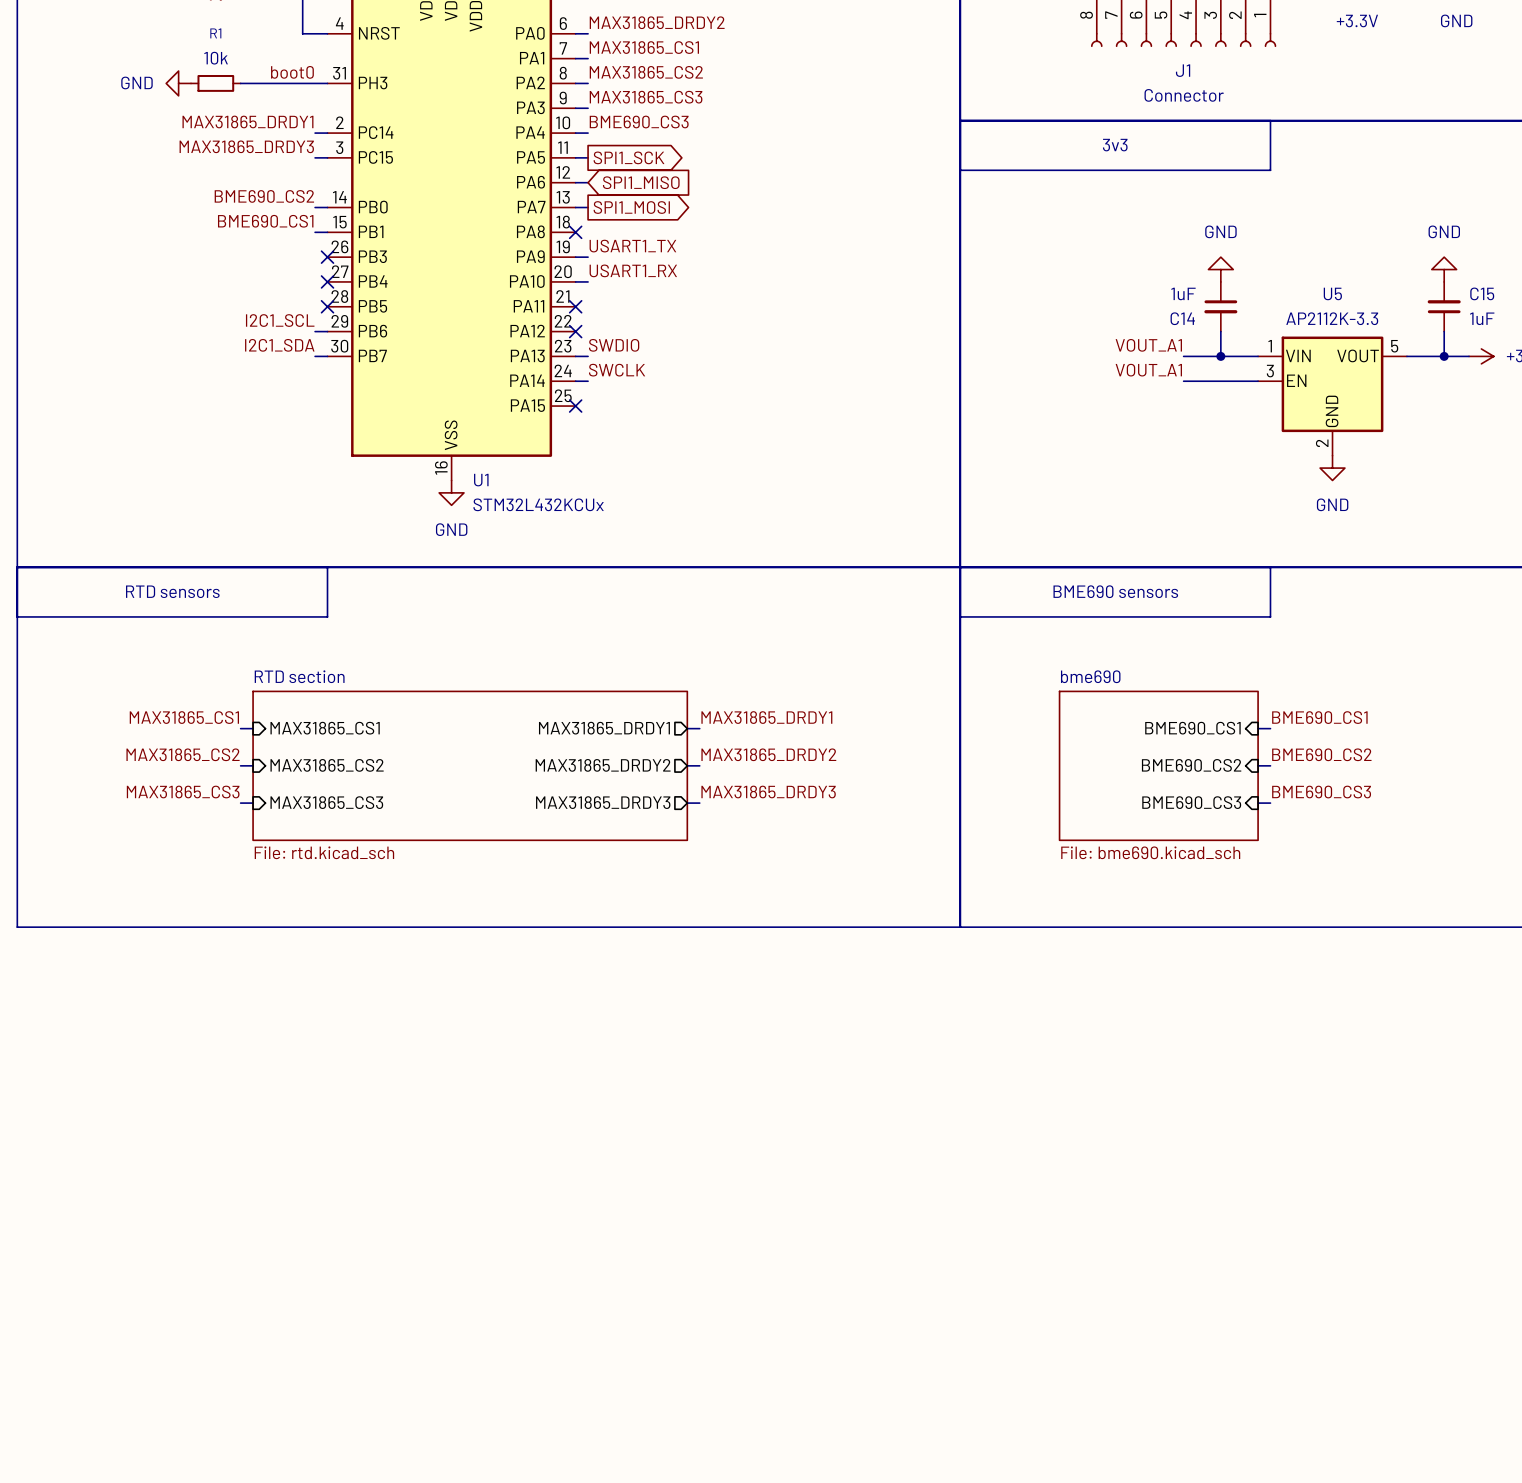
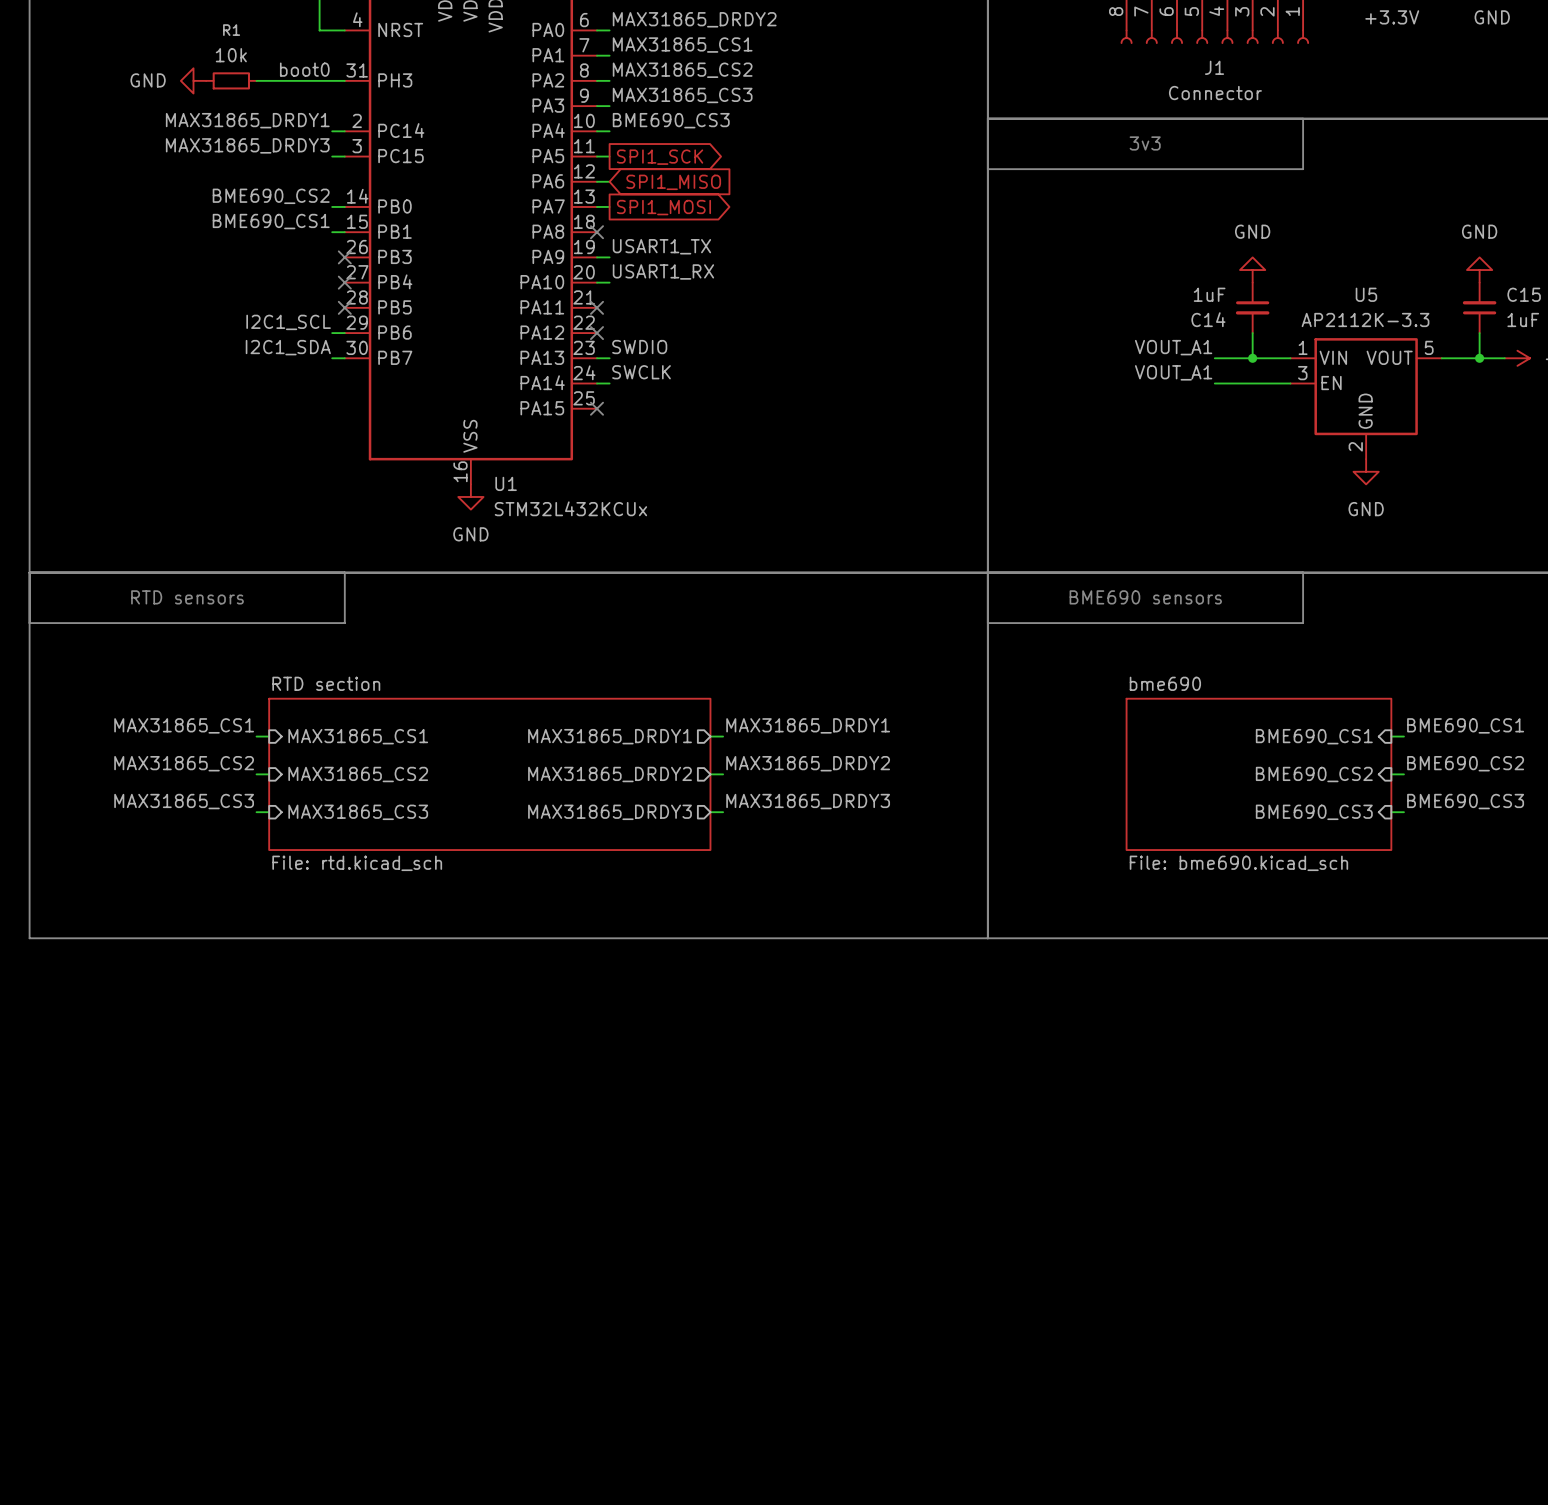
sheet bme690 name position: bme690 (1090, 676) -> bme690 (1165, 683)
sheet bme690 shape: [1058, 690, 1259, 842] -> [1125, 697, 1393, 851]
label position: BME690_CS1 (1319, 717) -> BME690_CS1 (1465, 725)
sheet pin position: BME690_CS1 (1192, 728) -> BME690_CS1 (1314, 736)
wire: (1258, 728) (1270, 728) -> (1391, 736) (1403, 736)
label position: BME690_CS2 (1321, 754) -> BME690_CS2 (1465, 763)
sheet pin position: BME690_CS2 (1191, 765) -> BME690_CS2 (1314, 774)
wire: (1258, 765) (1270, 765) -> (1391, 774) (1403, 774)
label position: BME690_CS3 (1321, 792) -> BME690_CS3 (1465, 801)
sheet pin position: BME690_CS3 (1191, 802) -> BME690_CS3 (1314, 812)
wire: (1258, 803) (1270, 803) -> (1391, 812) (1403, 812)
sheet bme690 value position: File: bme690.kicad_sch (1150, 852) -> File: bme690.kicad_sch (1238, 863)

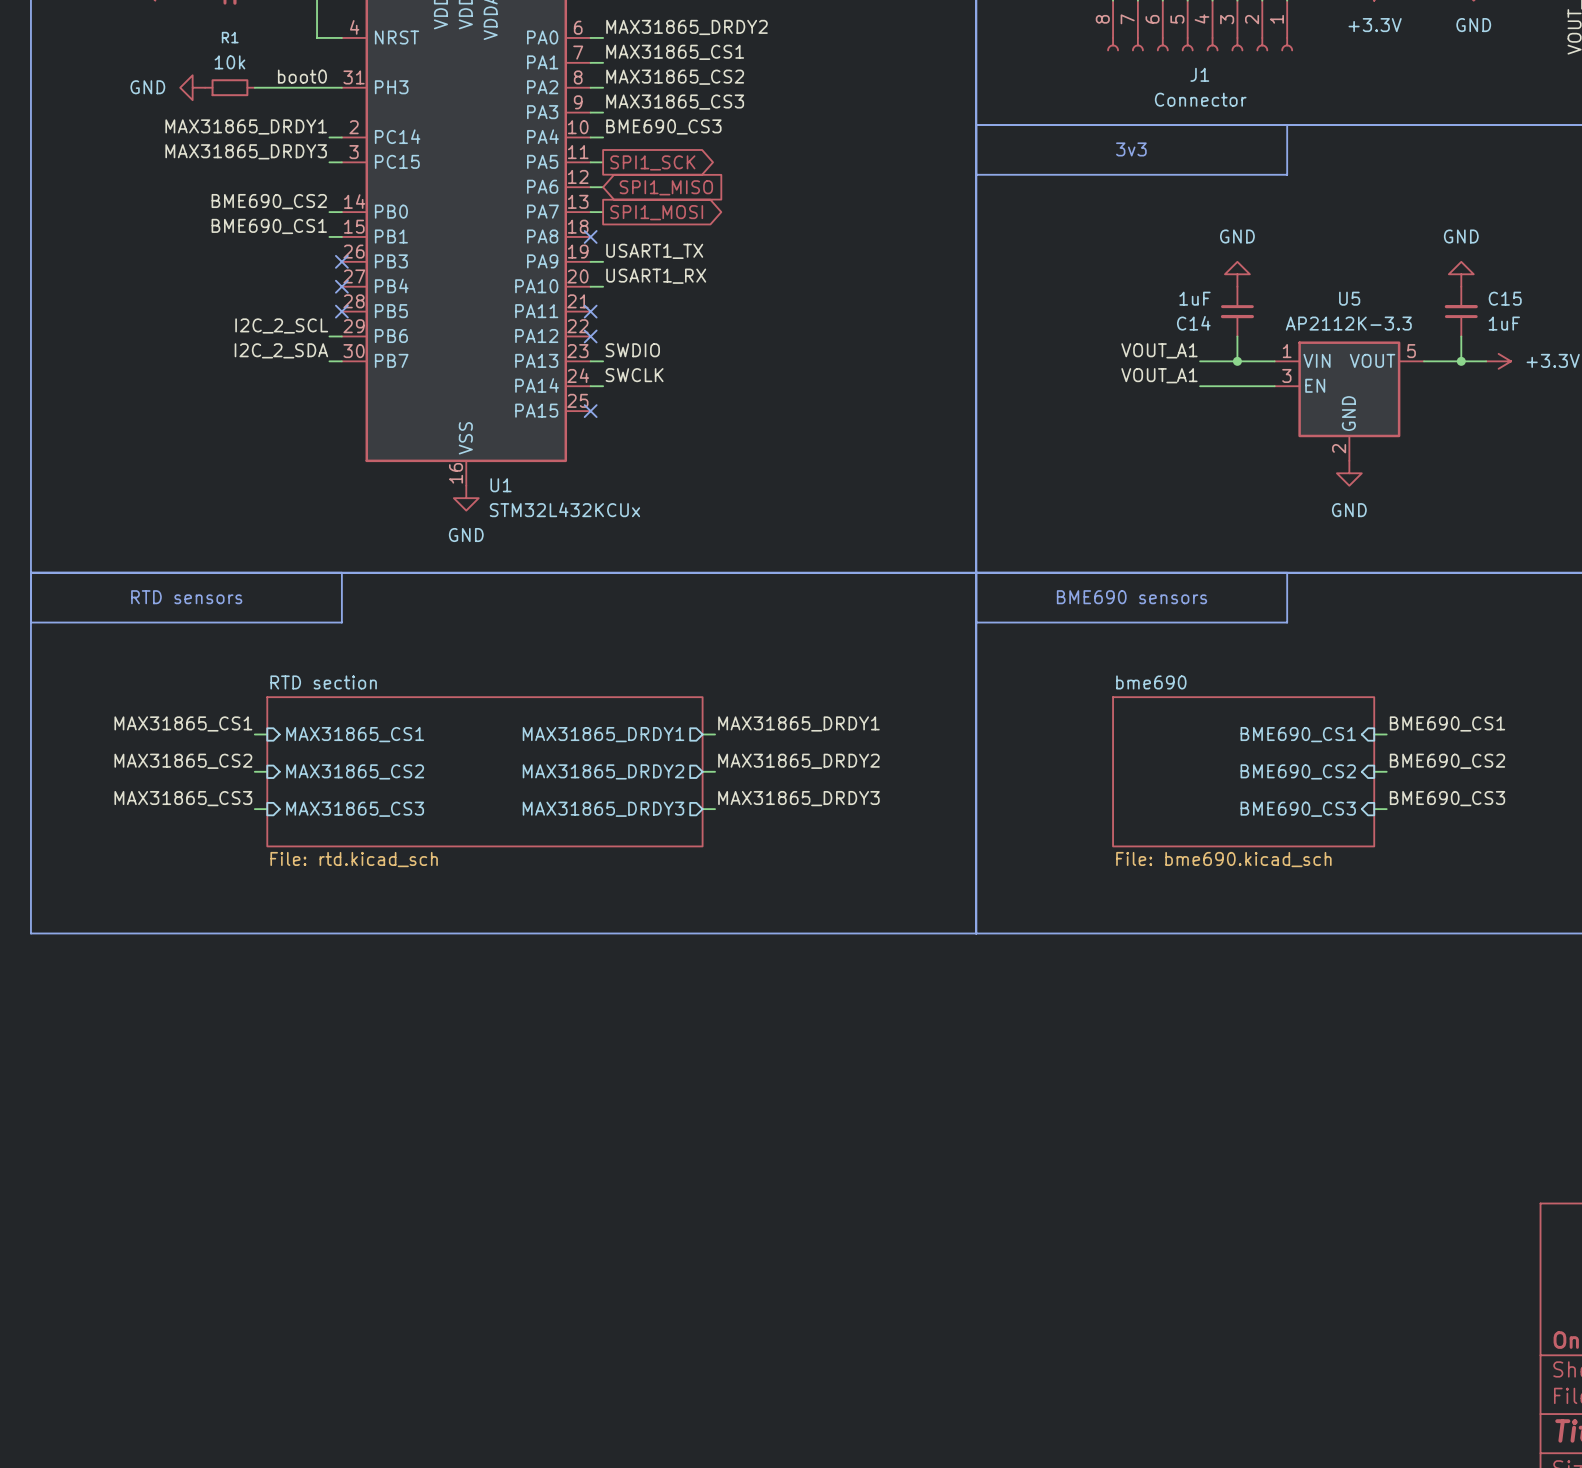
label: I2C1_SCL (288, 322) -> I2C_2_SCL (281, 325)
label: I2C1_SDA (288, 347) -> I2C_2_SDA (281, 350)

